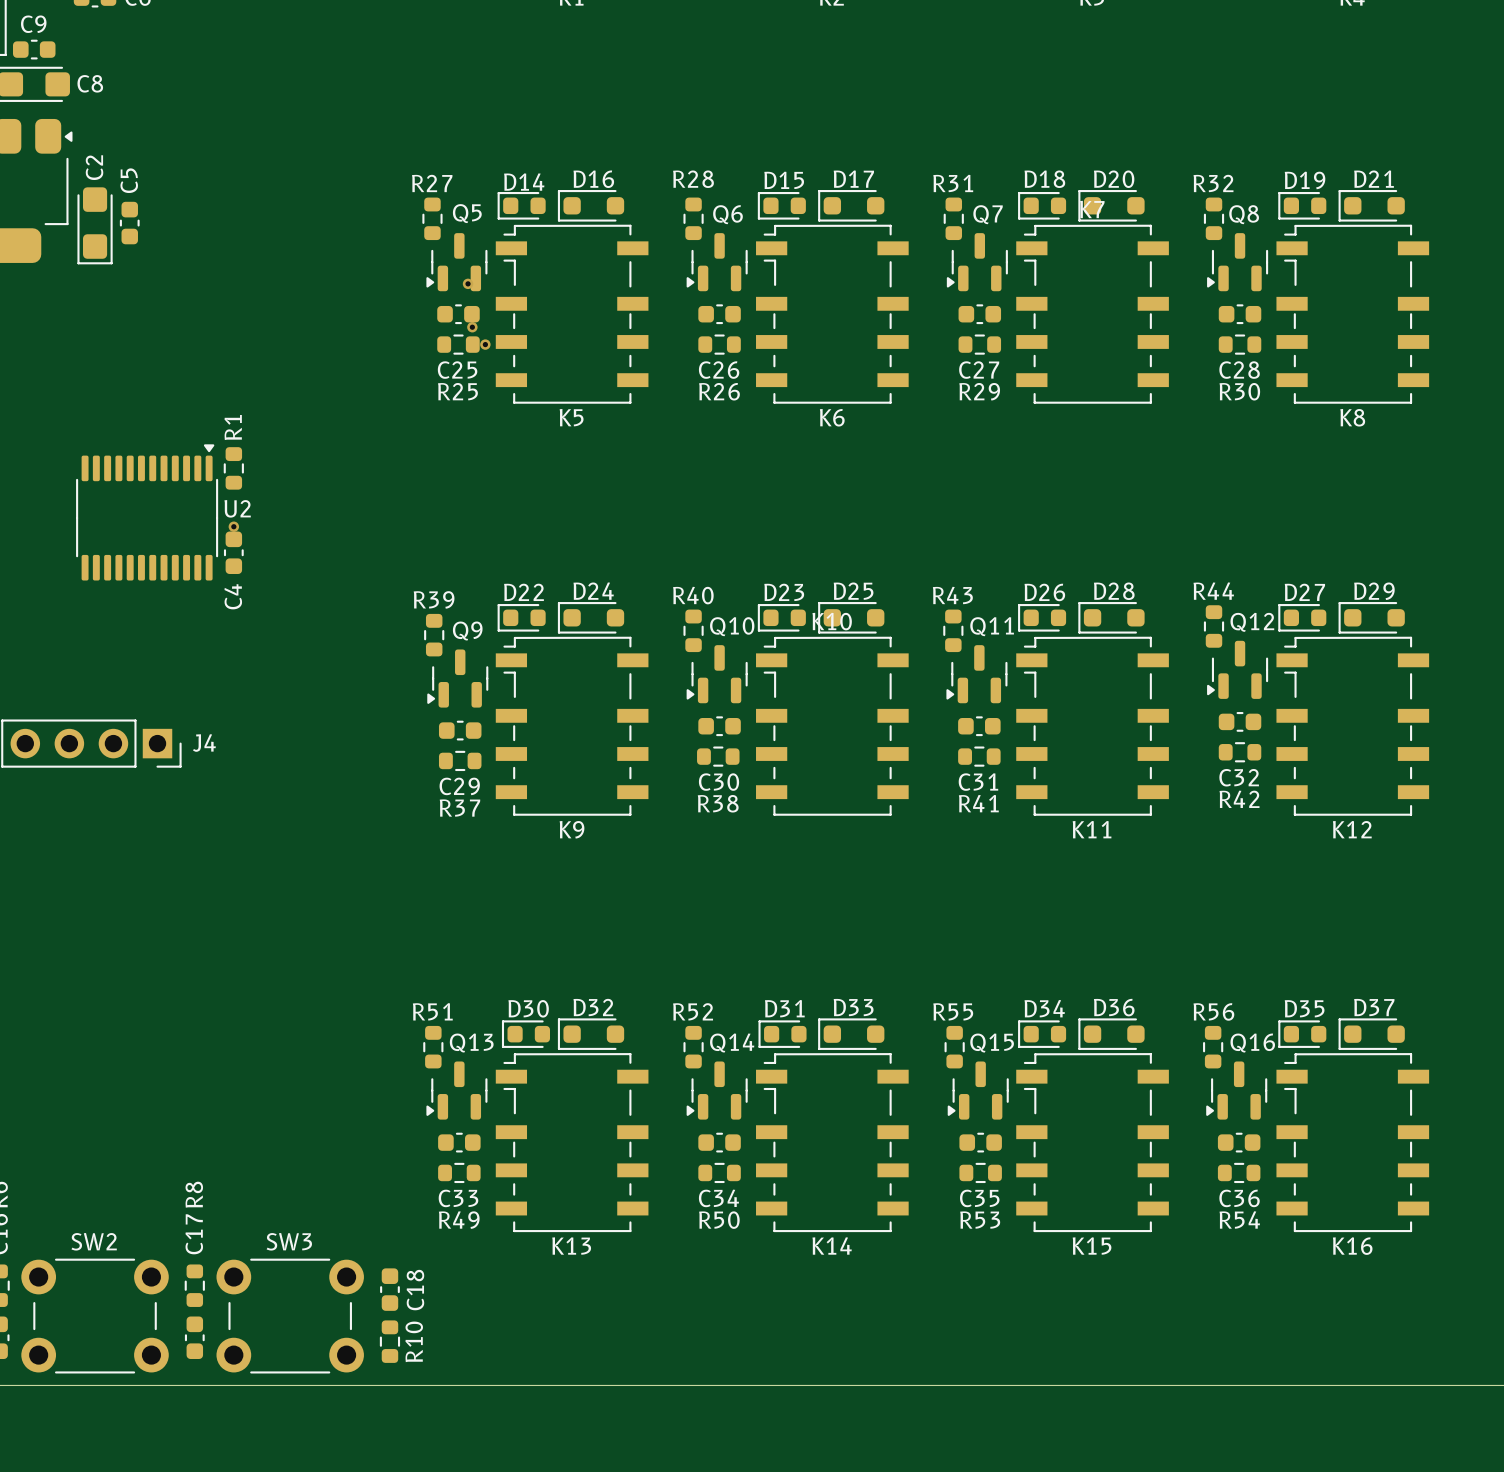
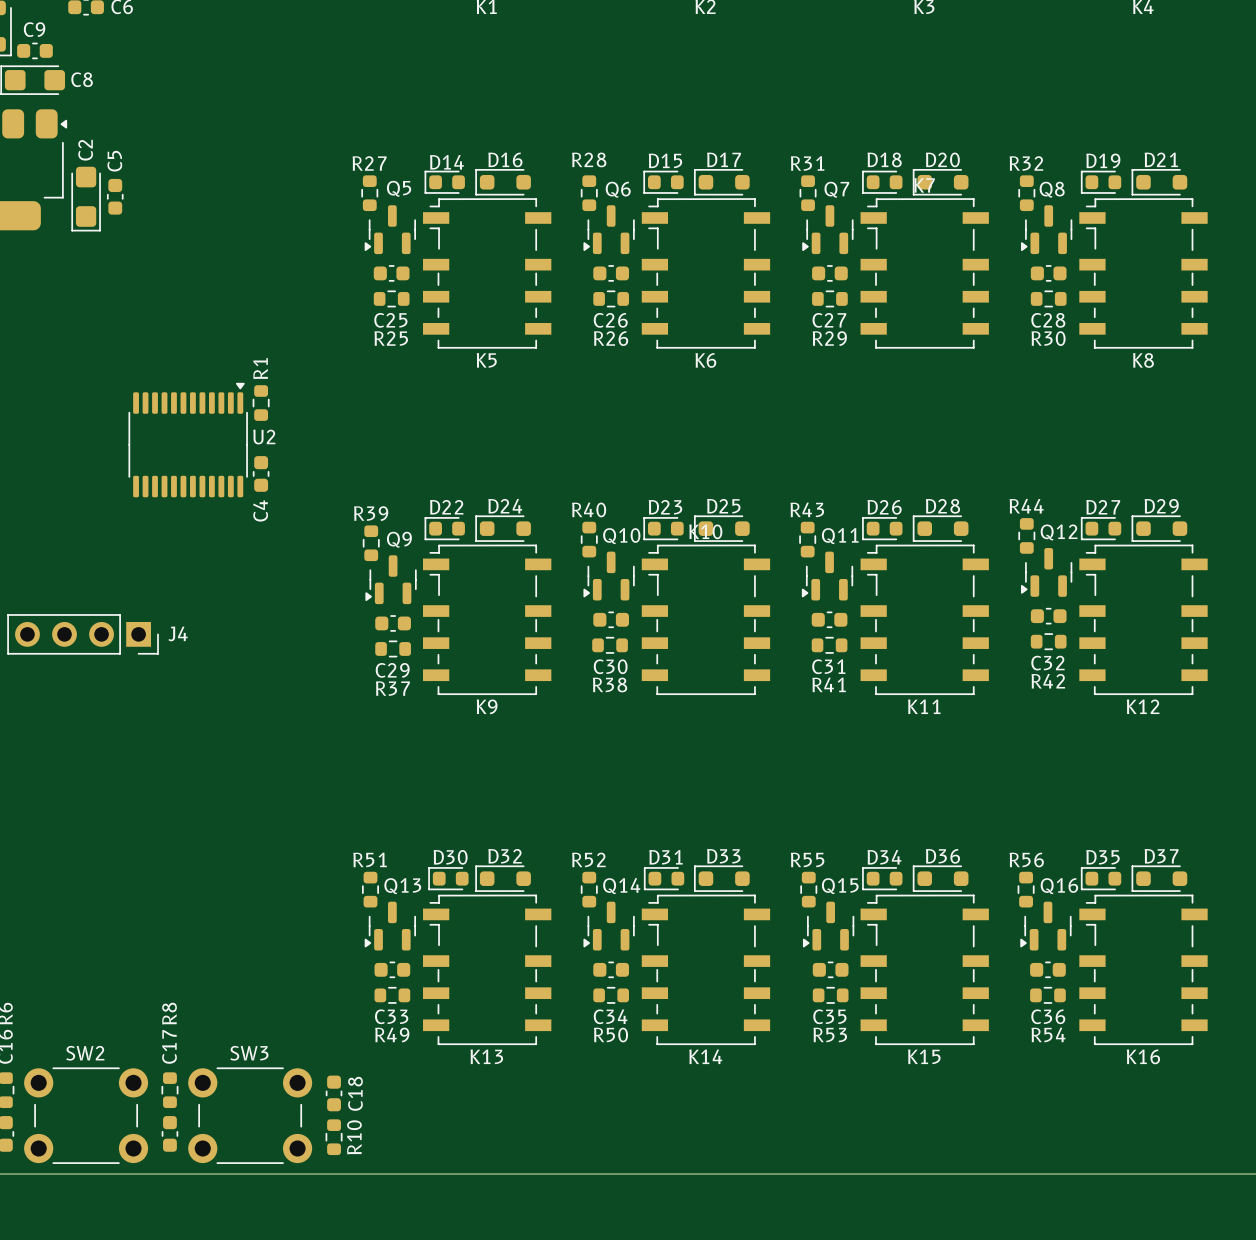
via: (468, 283) -> none
via: (472, 327) -> none
via: (485, 344) -> none
R1 position: (233, 468) -> (261, 403)
U2 position: (147, 512) -> (188, 440)
via: (233, 526) -> none
C4 position: (233, 552) -> (261, 473)

